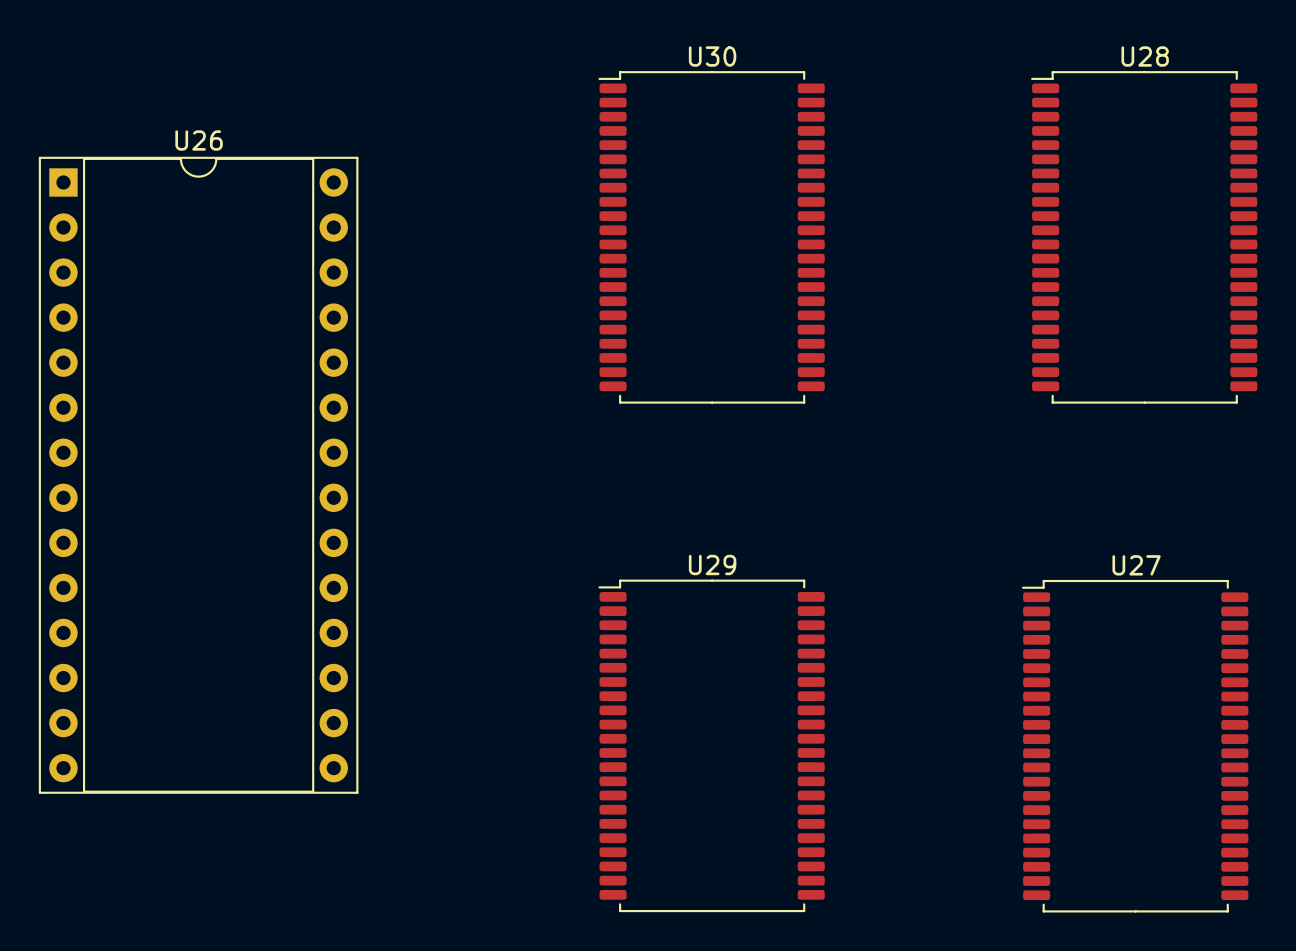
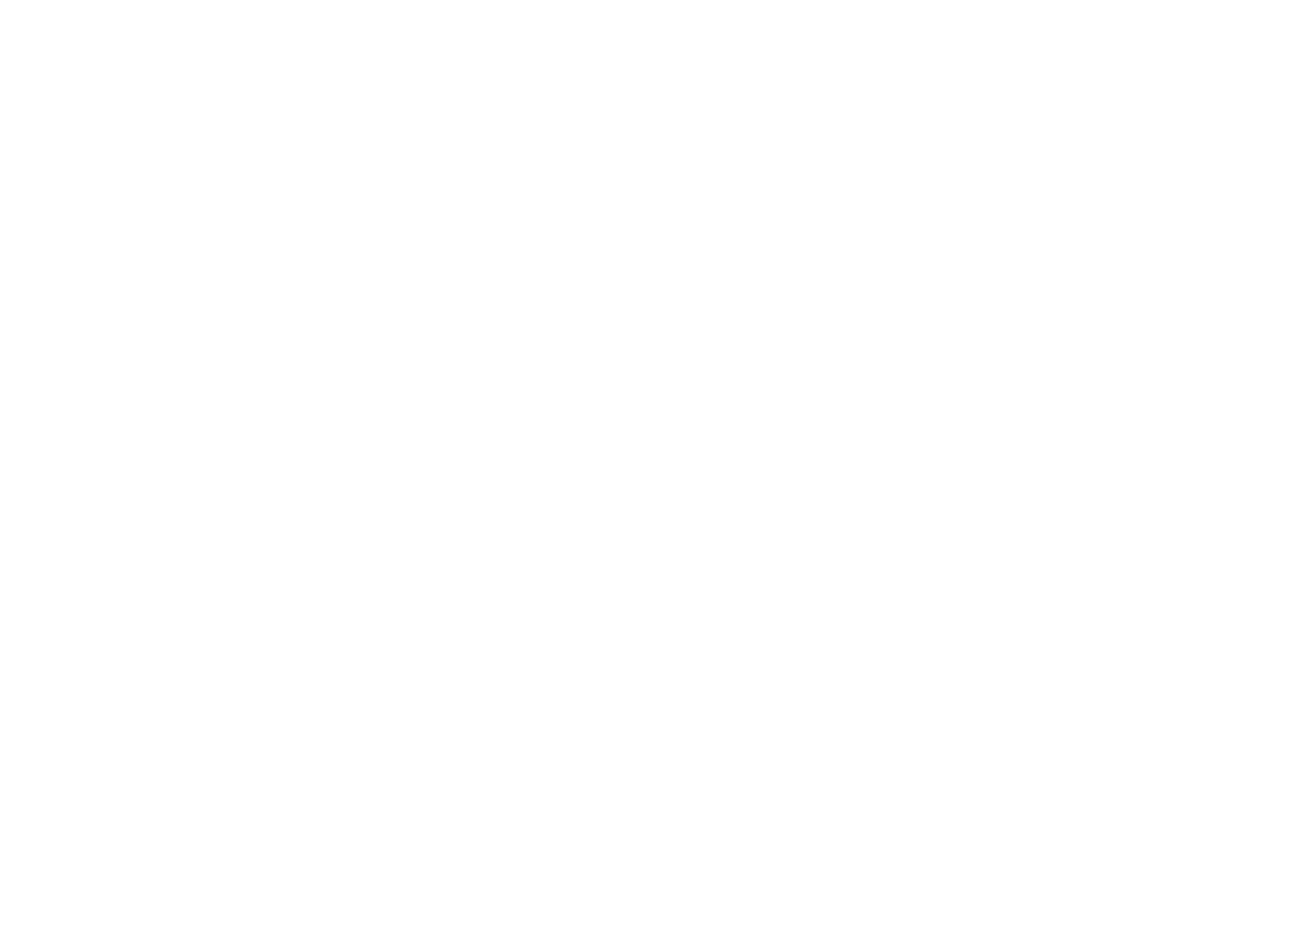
U30: (711, 237) -> none
U28: (1144, 237) -> none
U26: (198, 475) -> none
U29: (711, 745) -> none
U27: (1135, 746) -> none

